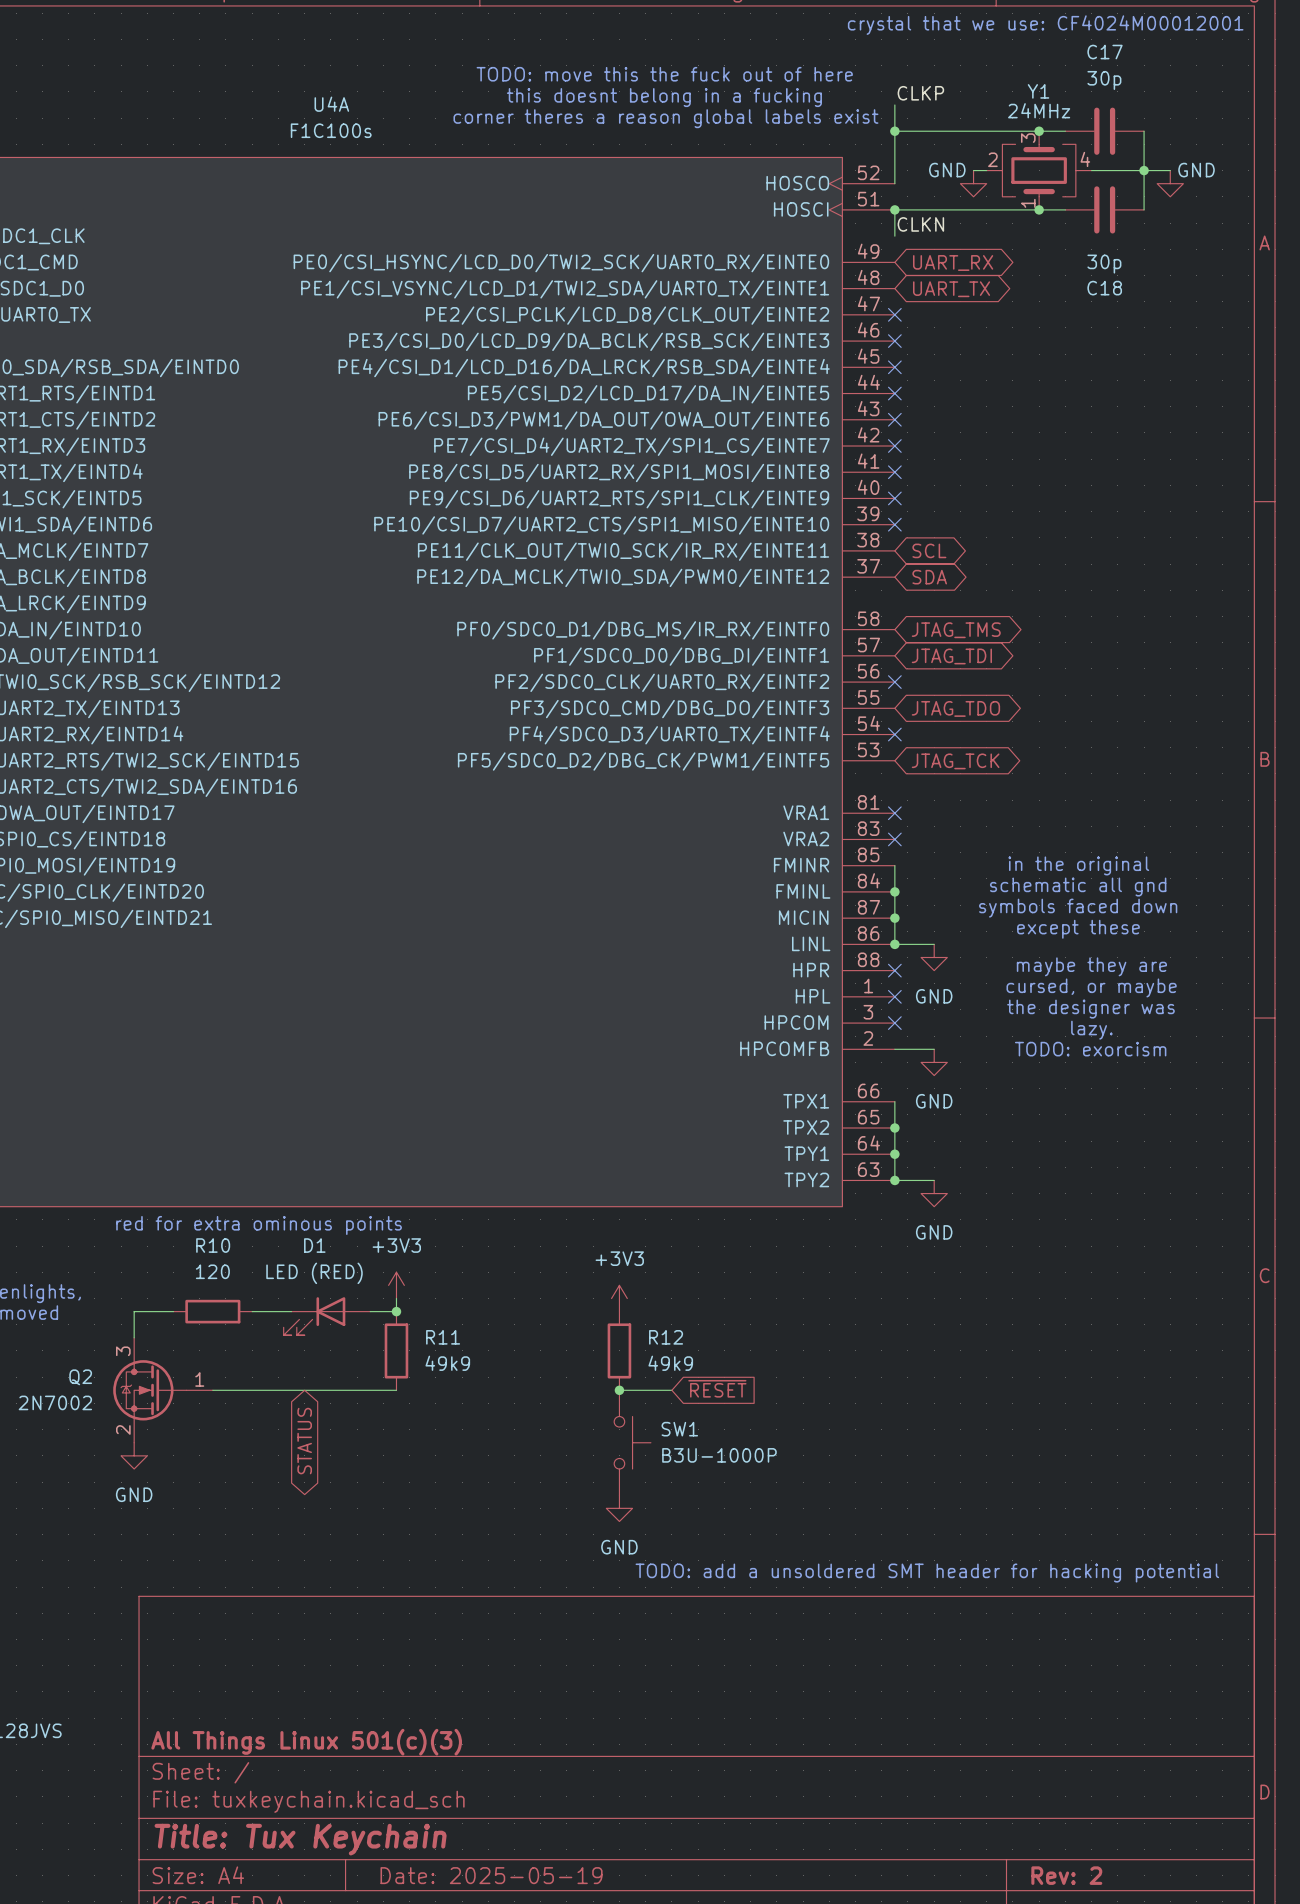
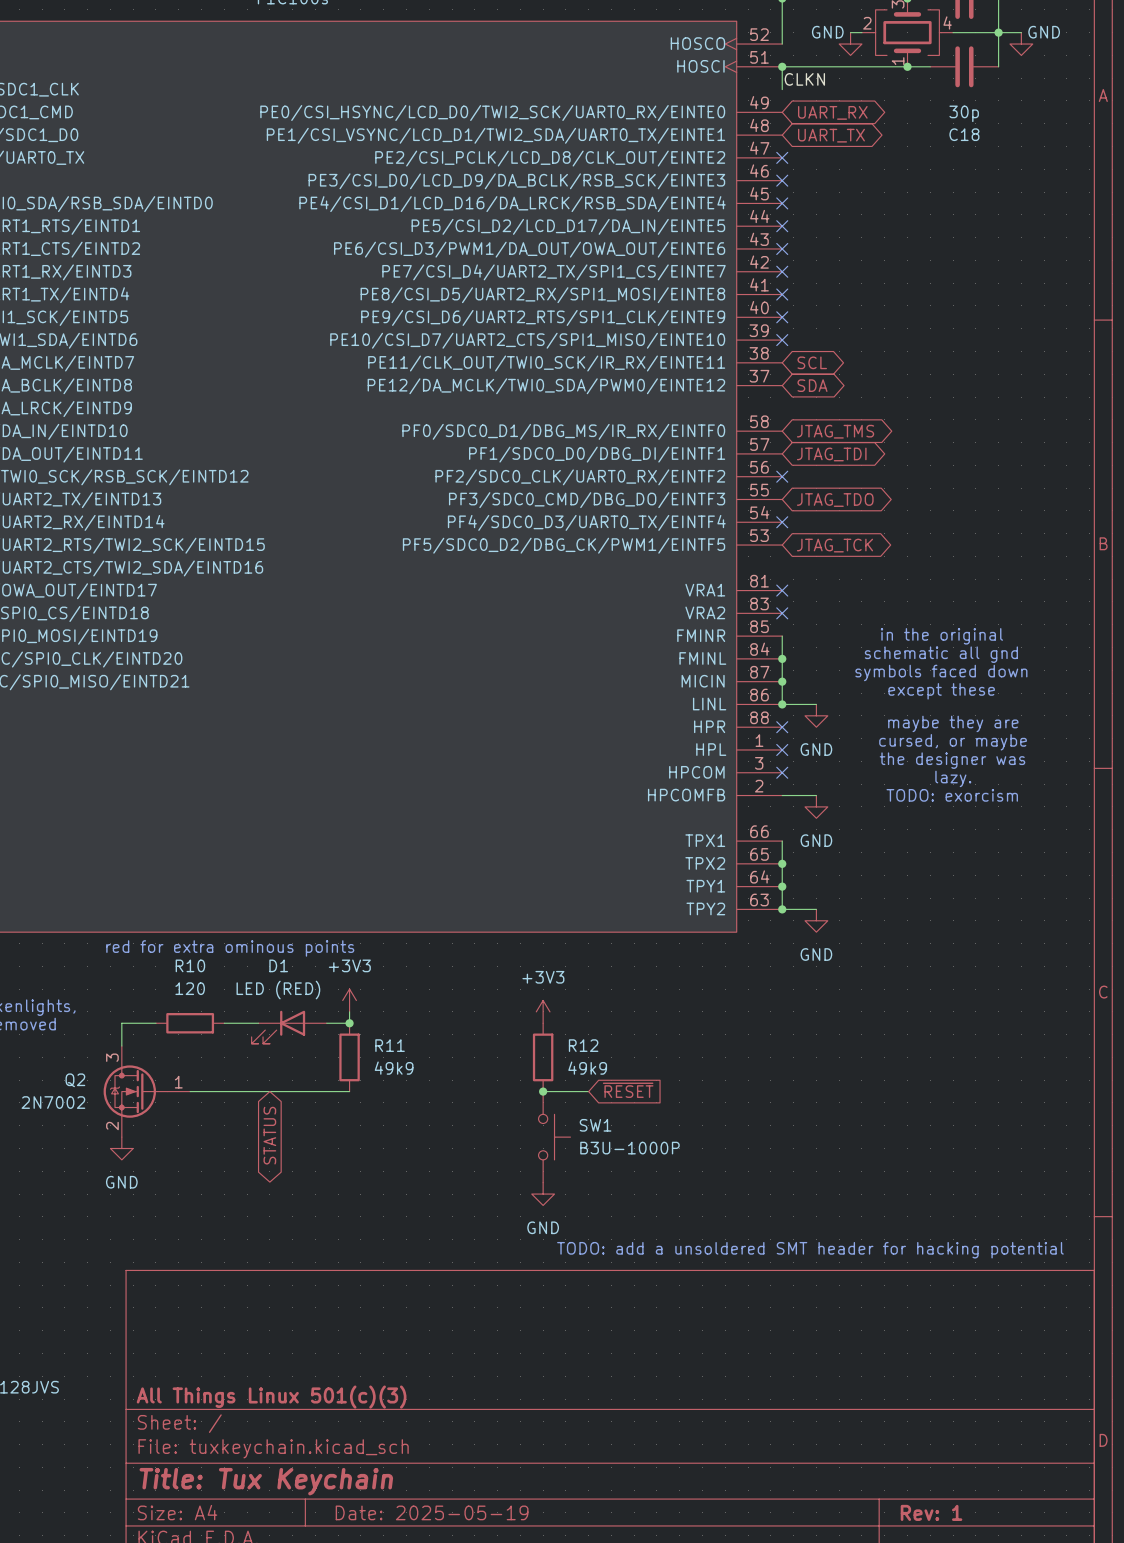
title block: Rev: 2 (1066, 1875) -> Rev: 1 (931, 1512)

